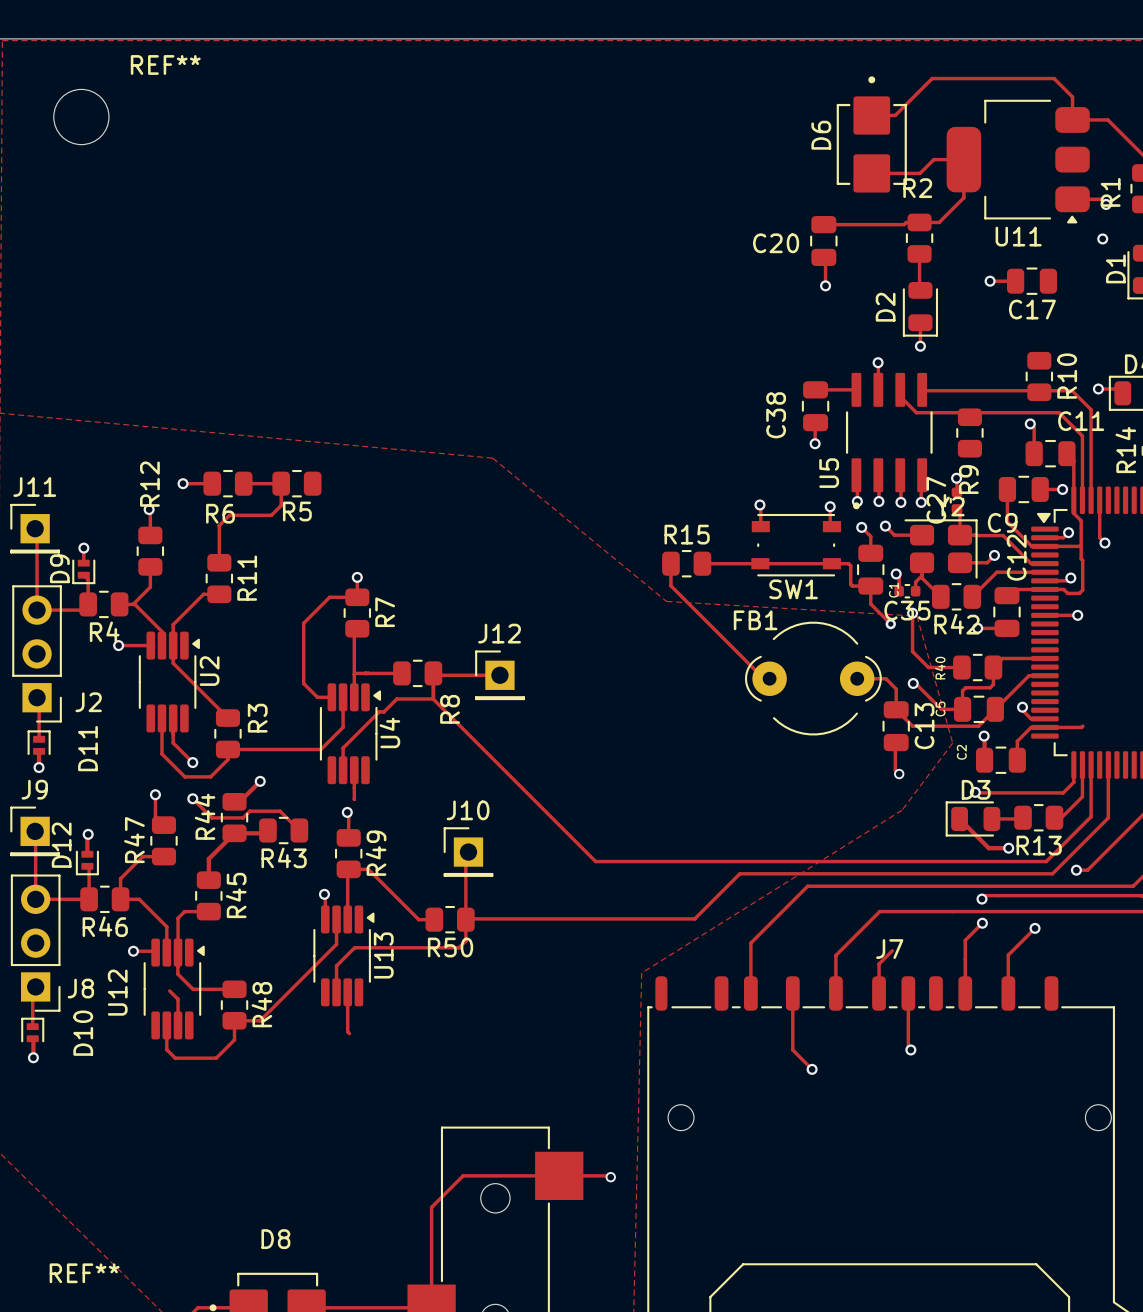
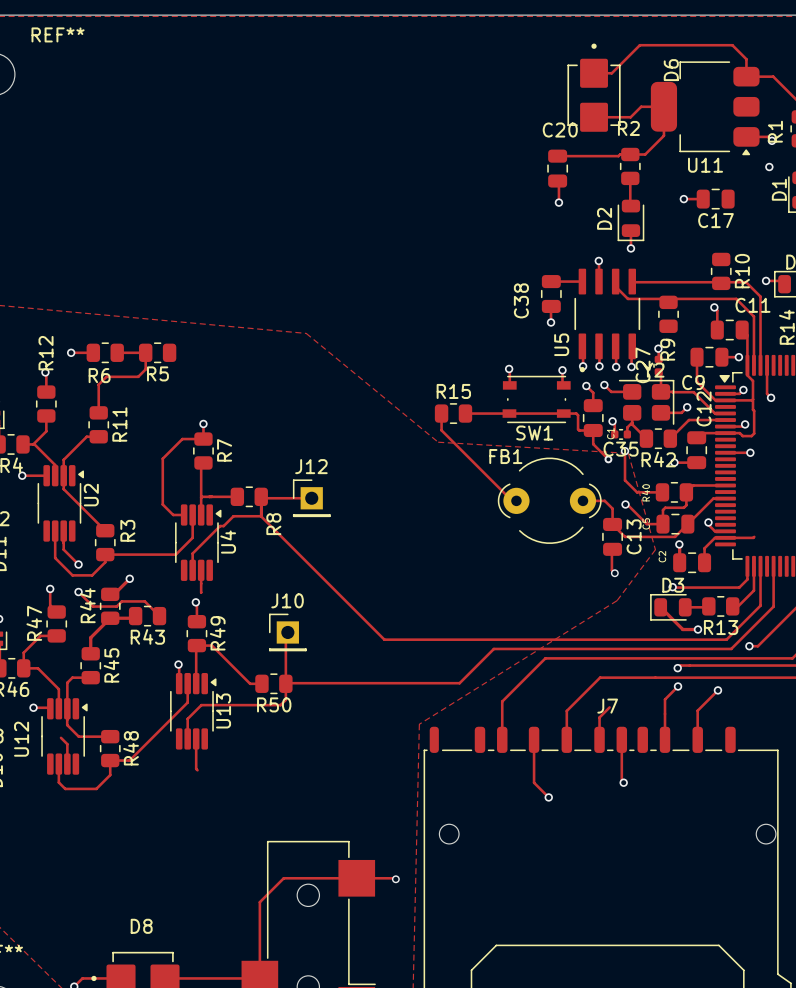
D6 name position: D6 (821, 135) -> D6 (671, 70)
C20 name position: C20 (776, 243) -> C20 (560, 130)

